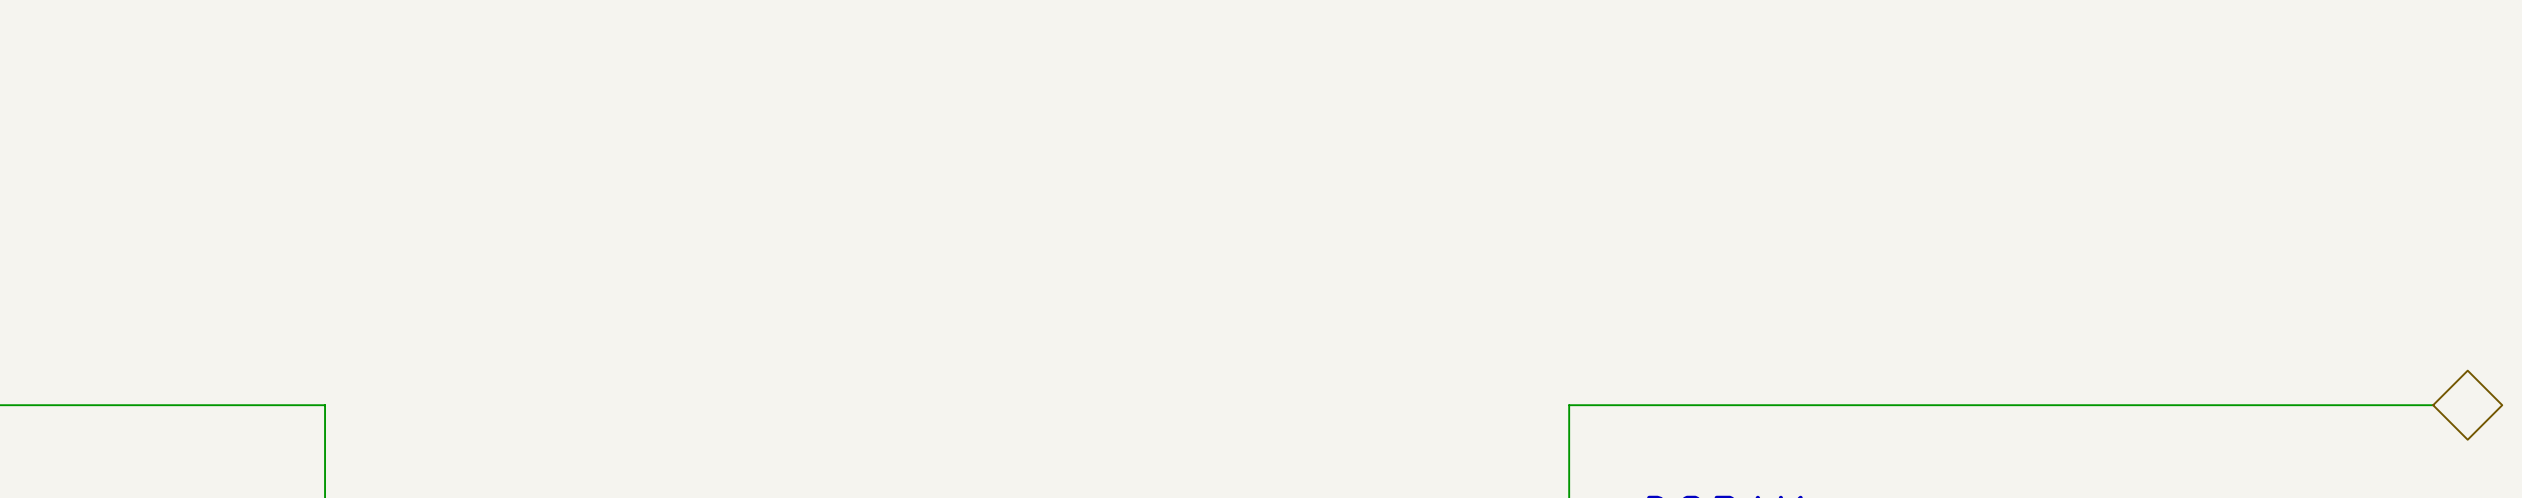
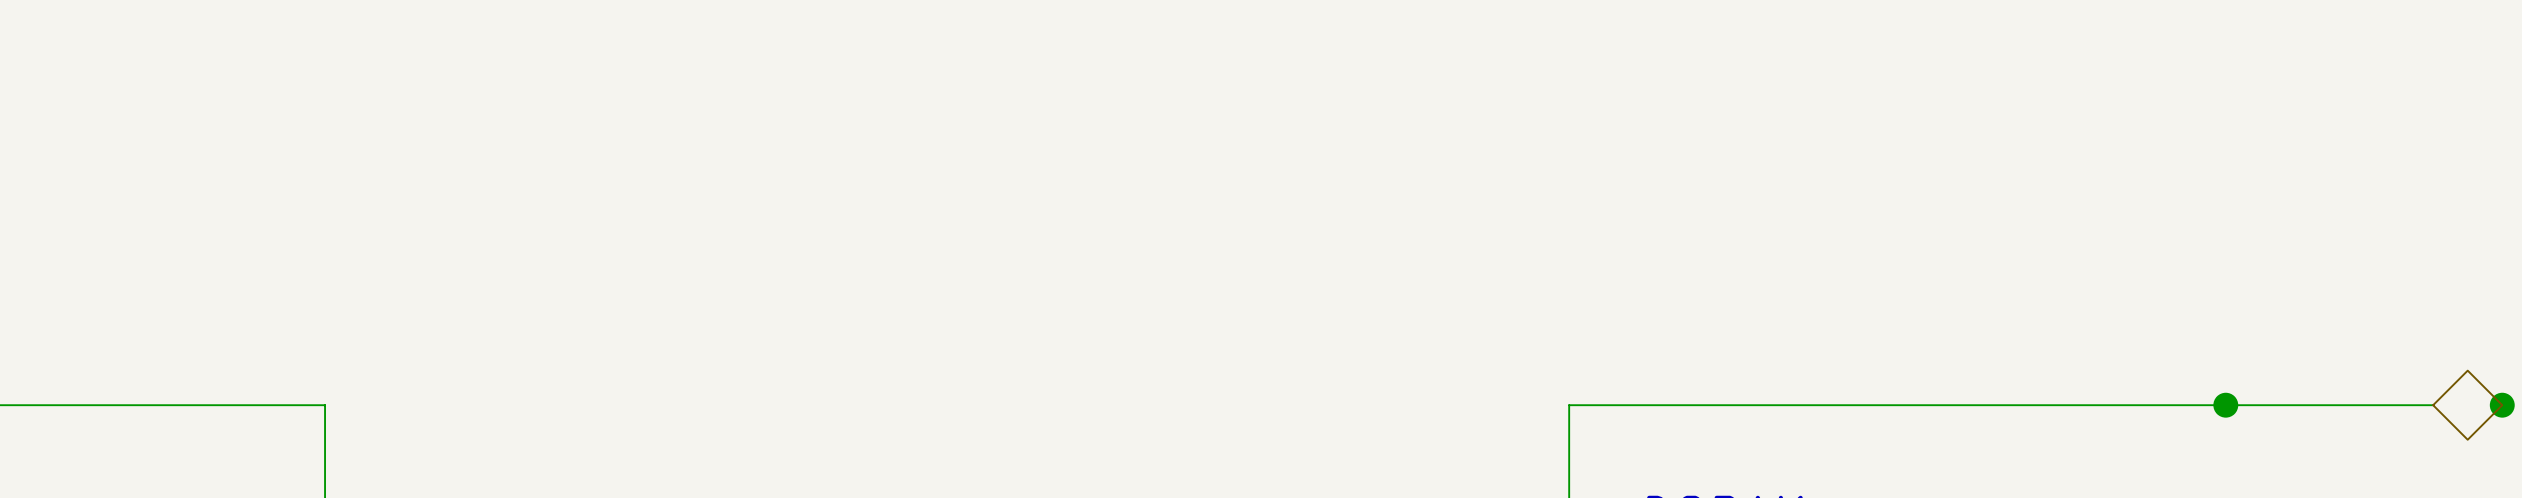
junction: none -> (2225, 405)
junction: none -> (2502, 405)

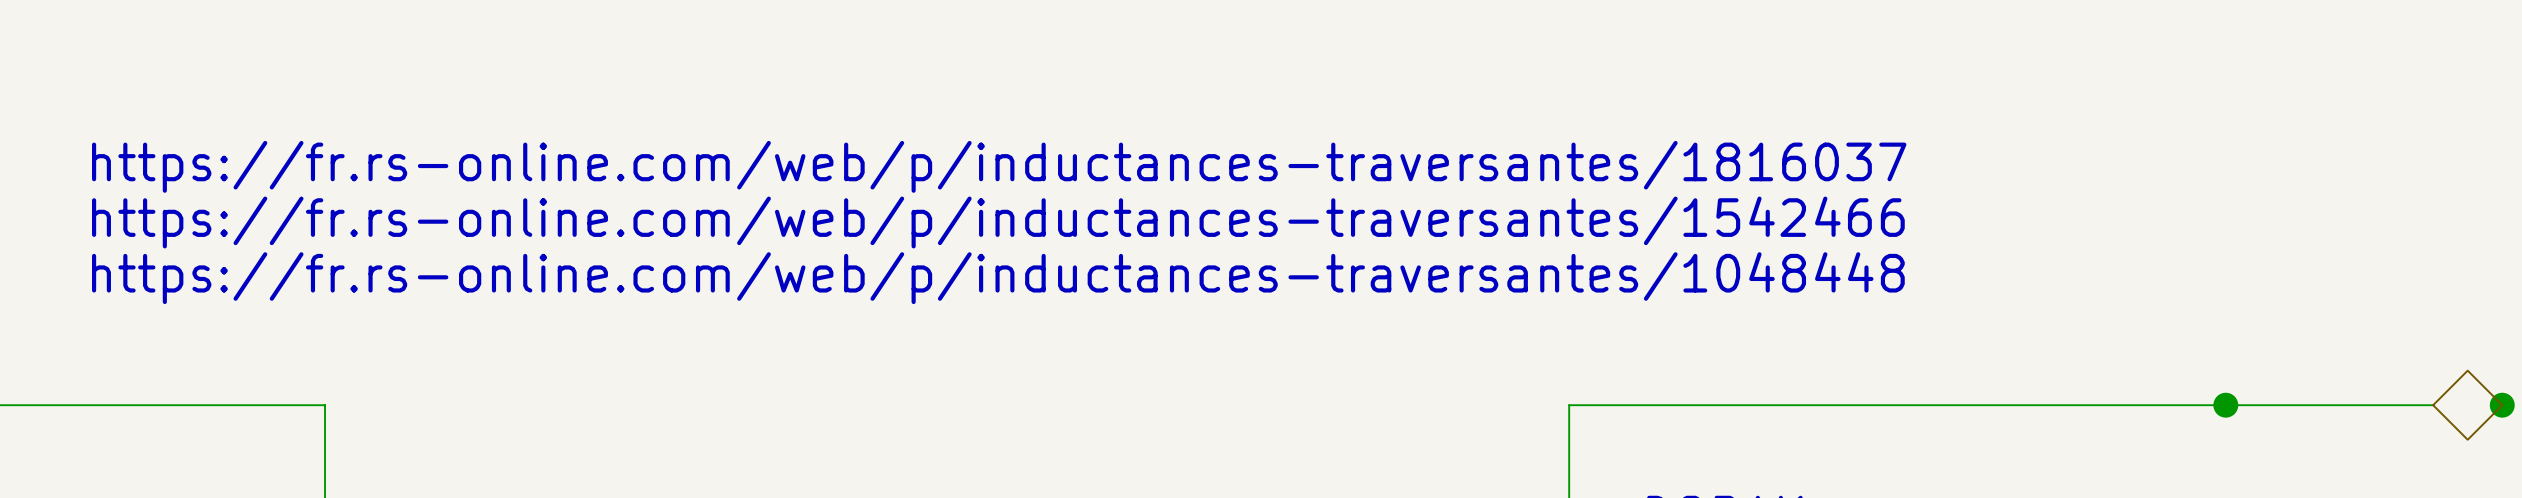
text: none -> https://fr.rs-online.com/web/p/inductances-traversantes/1816037 (999, 166)
text: none -> https://fr.rs-online.com/web/p/inductances-traversantes/1542466 (998, 222)
text: none -> https://fr.rs-online.com/web/p/inductances-traversantes/1048448 (998, 278)

